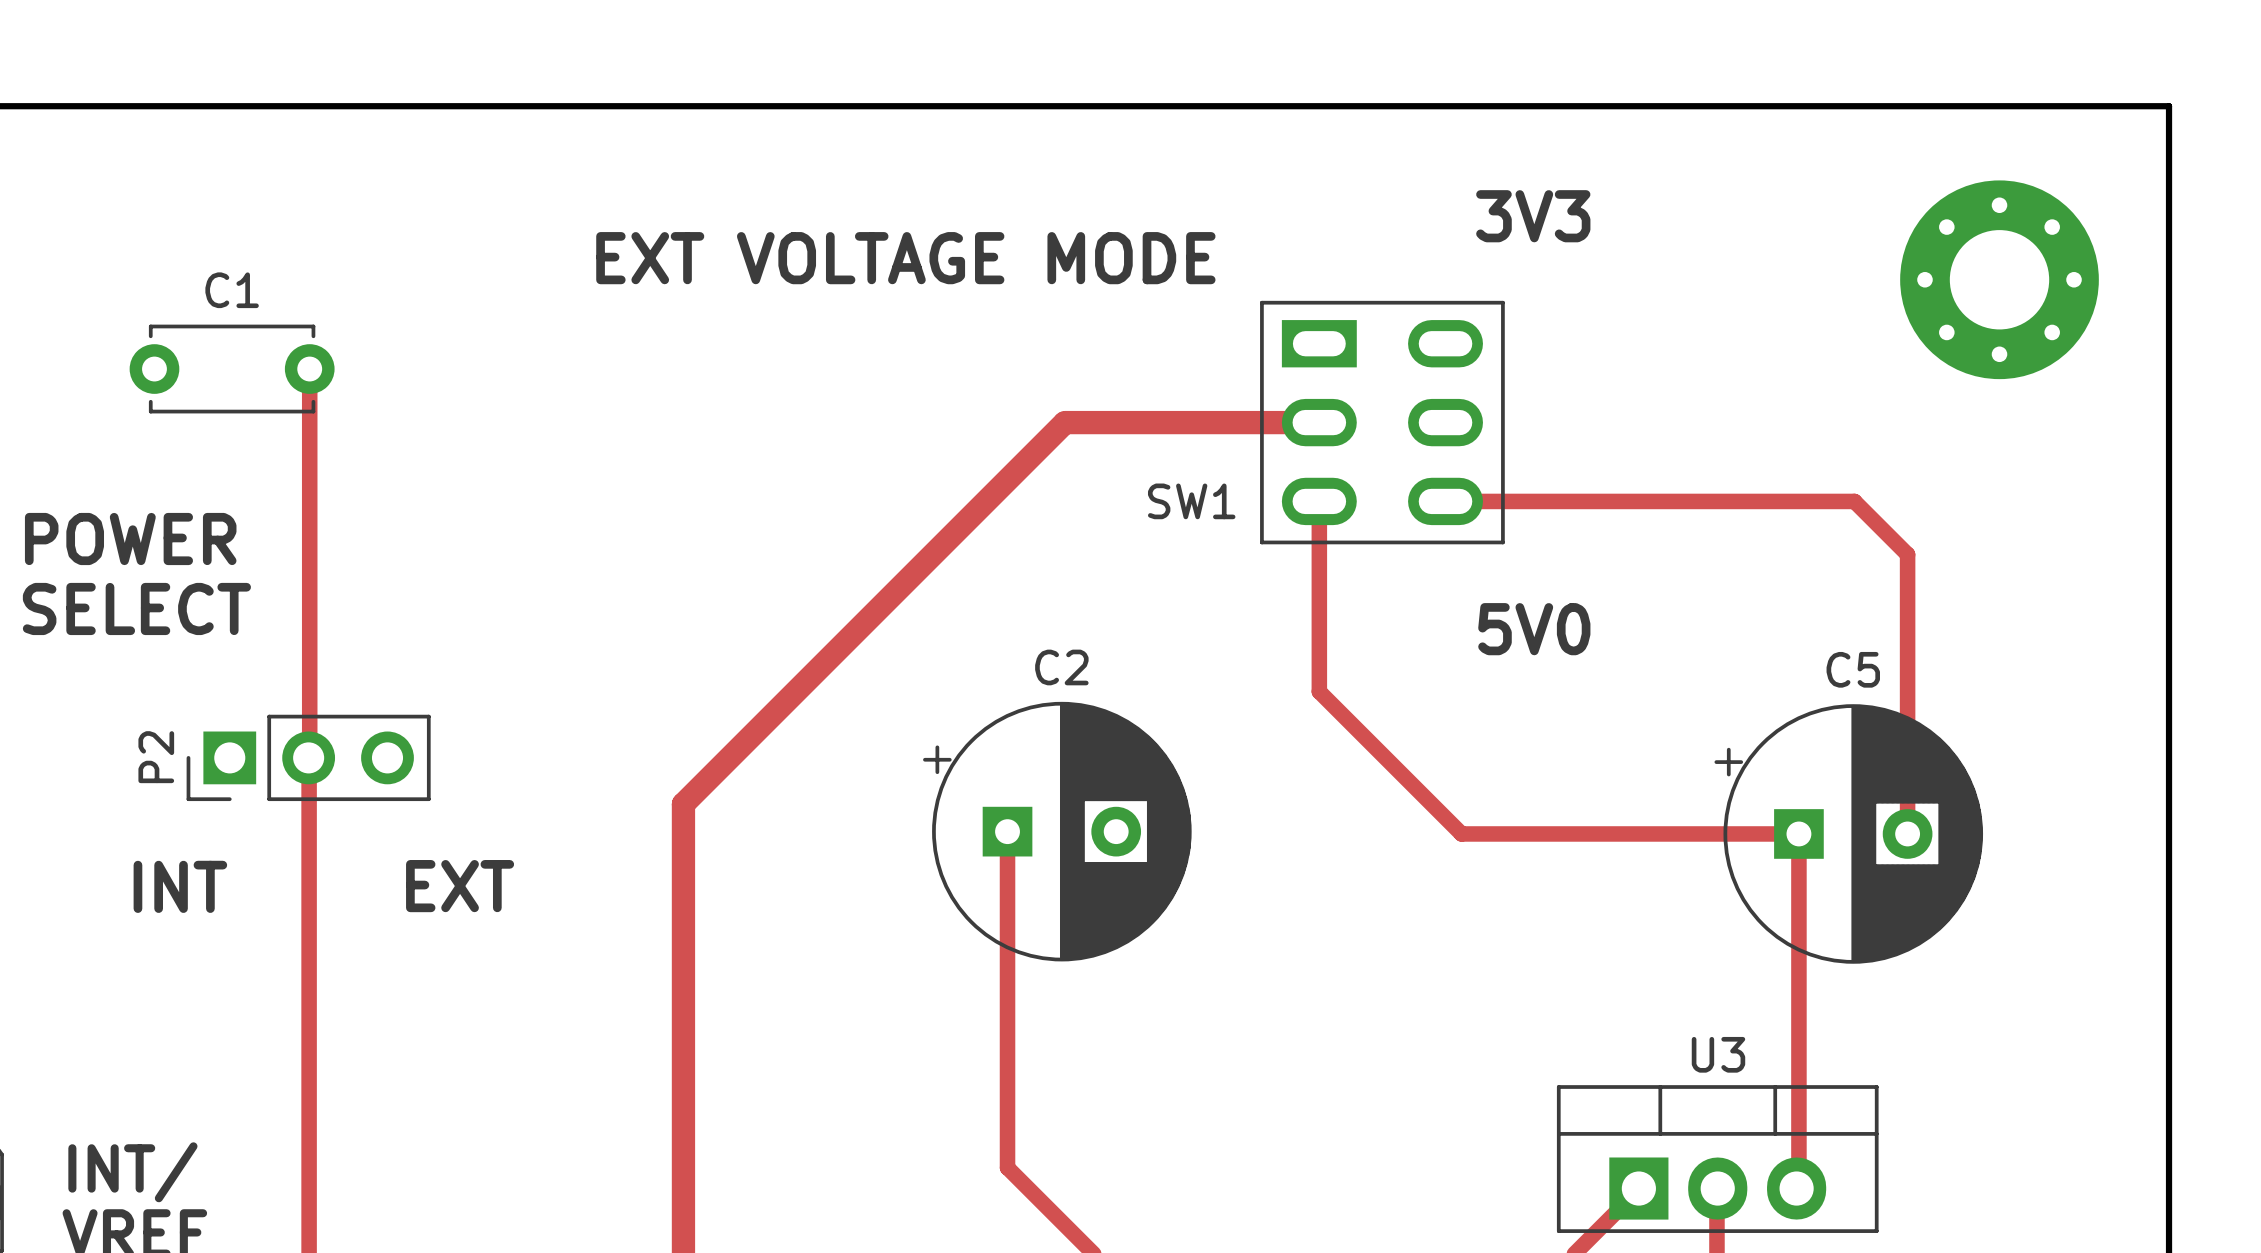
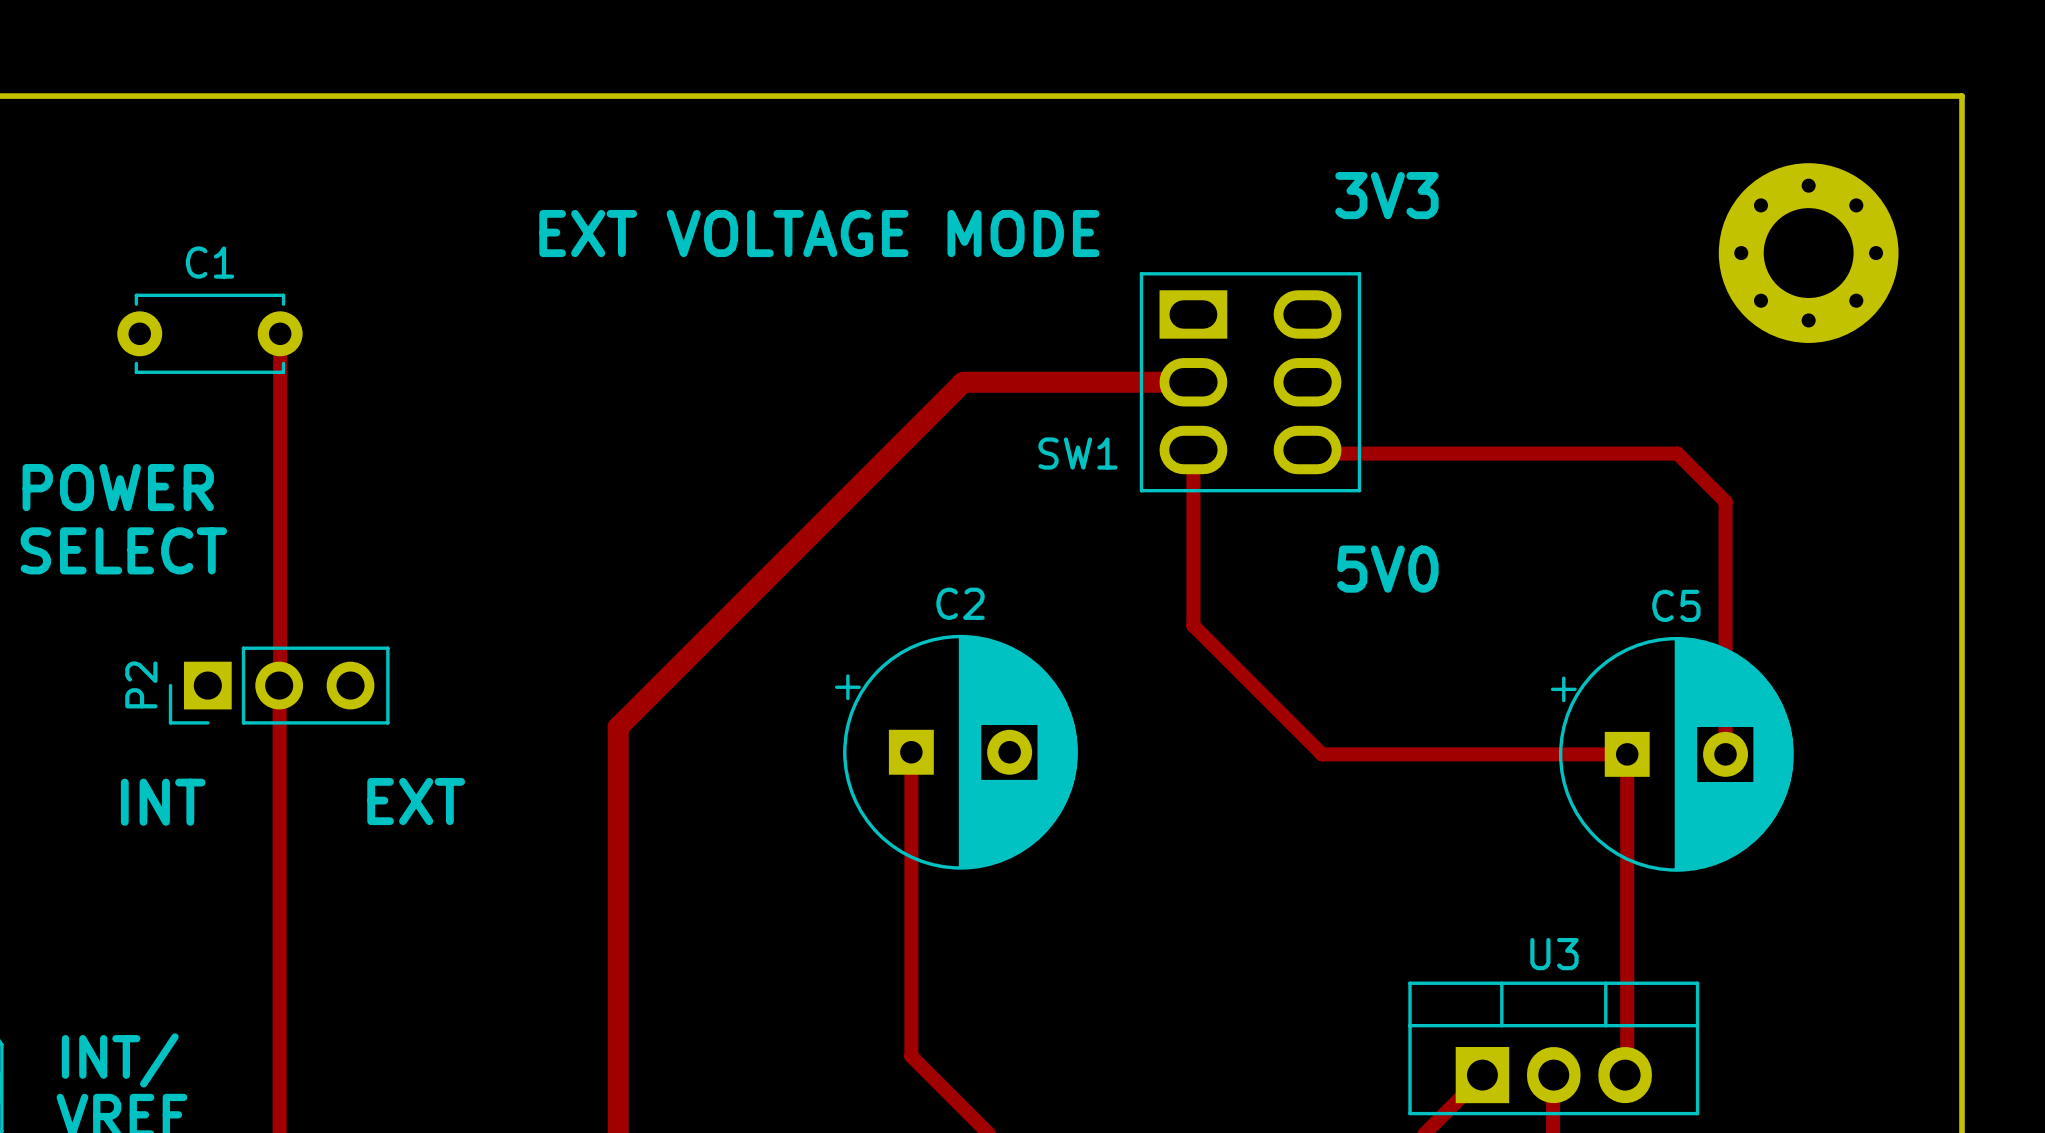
SW1 footprint: [1260, 300, 1505, 545] -> [1139, 272, 1362, 493]

